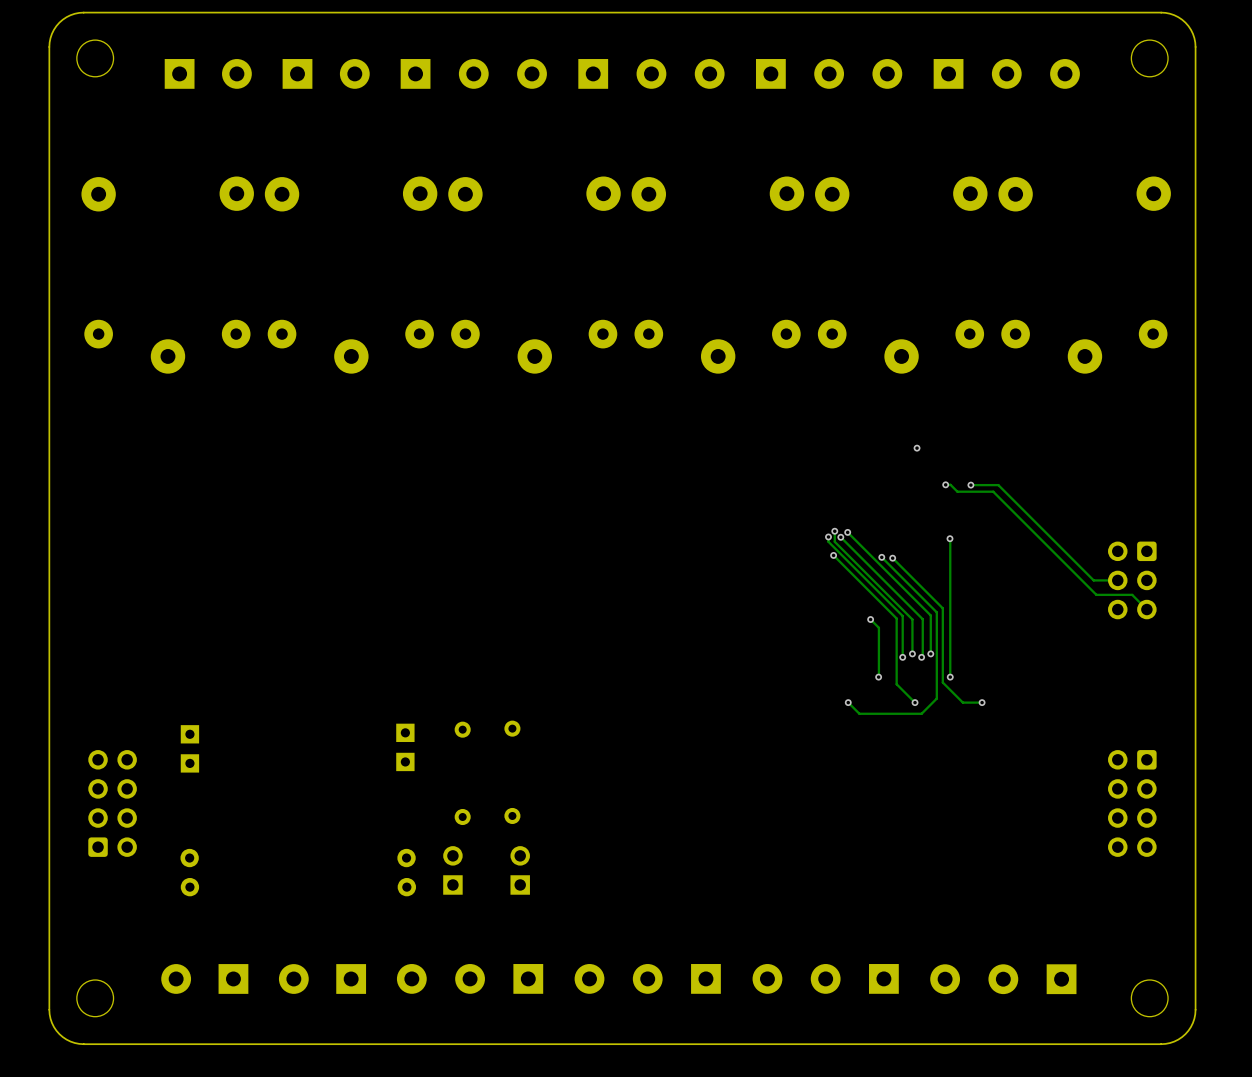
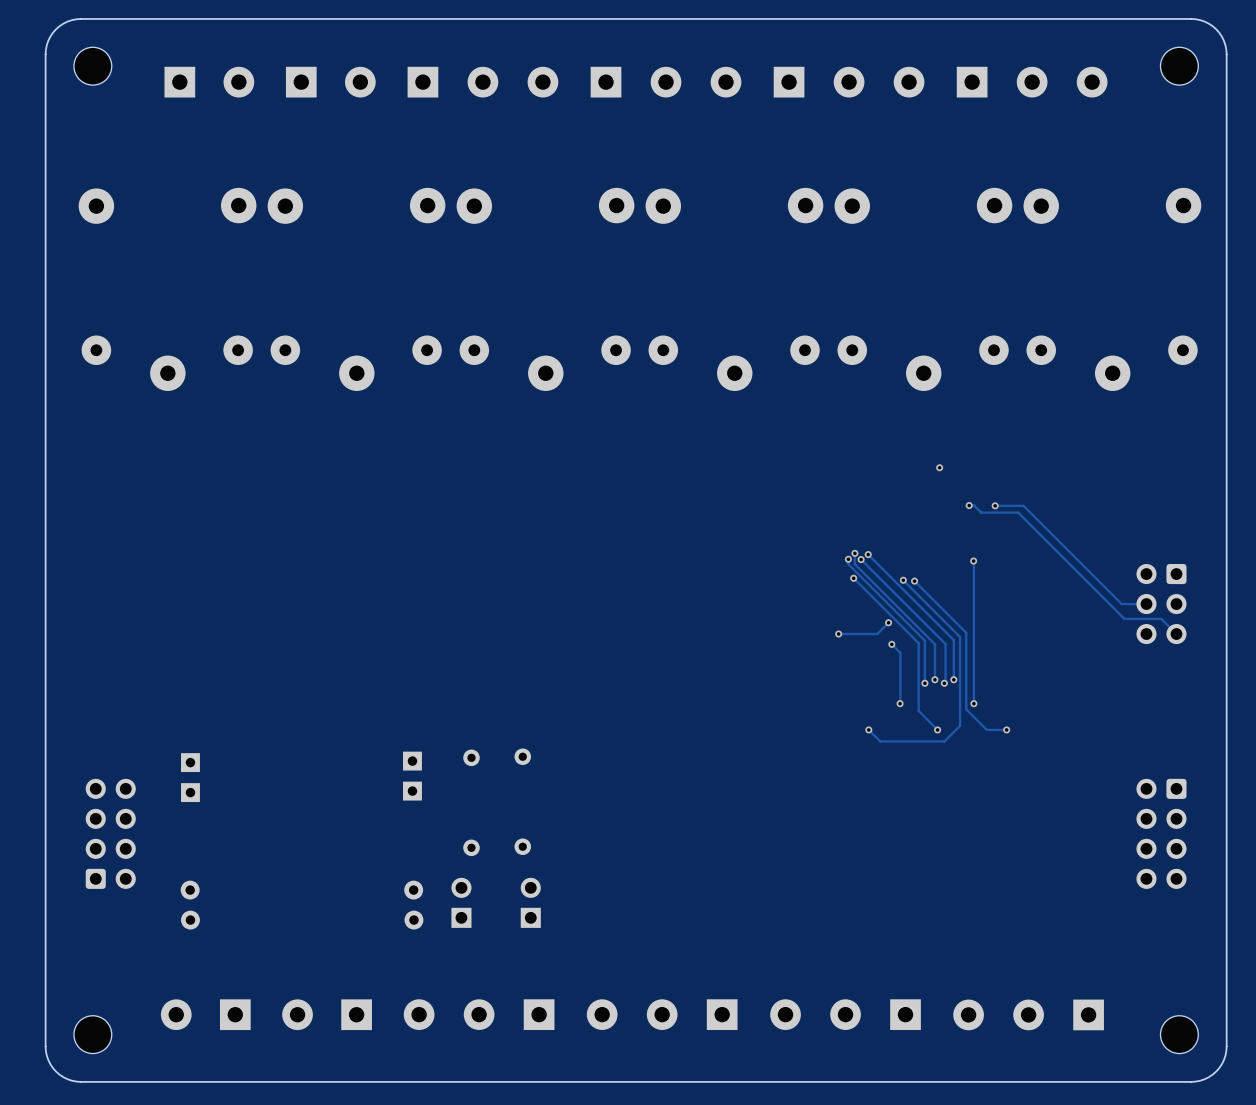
track: none -> (888, 622) (877, 633) (838, 633)
via: none -> (888, 622)
via: none -> (838, 633)

